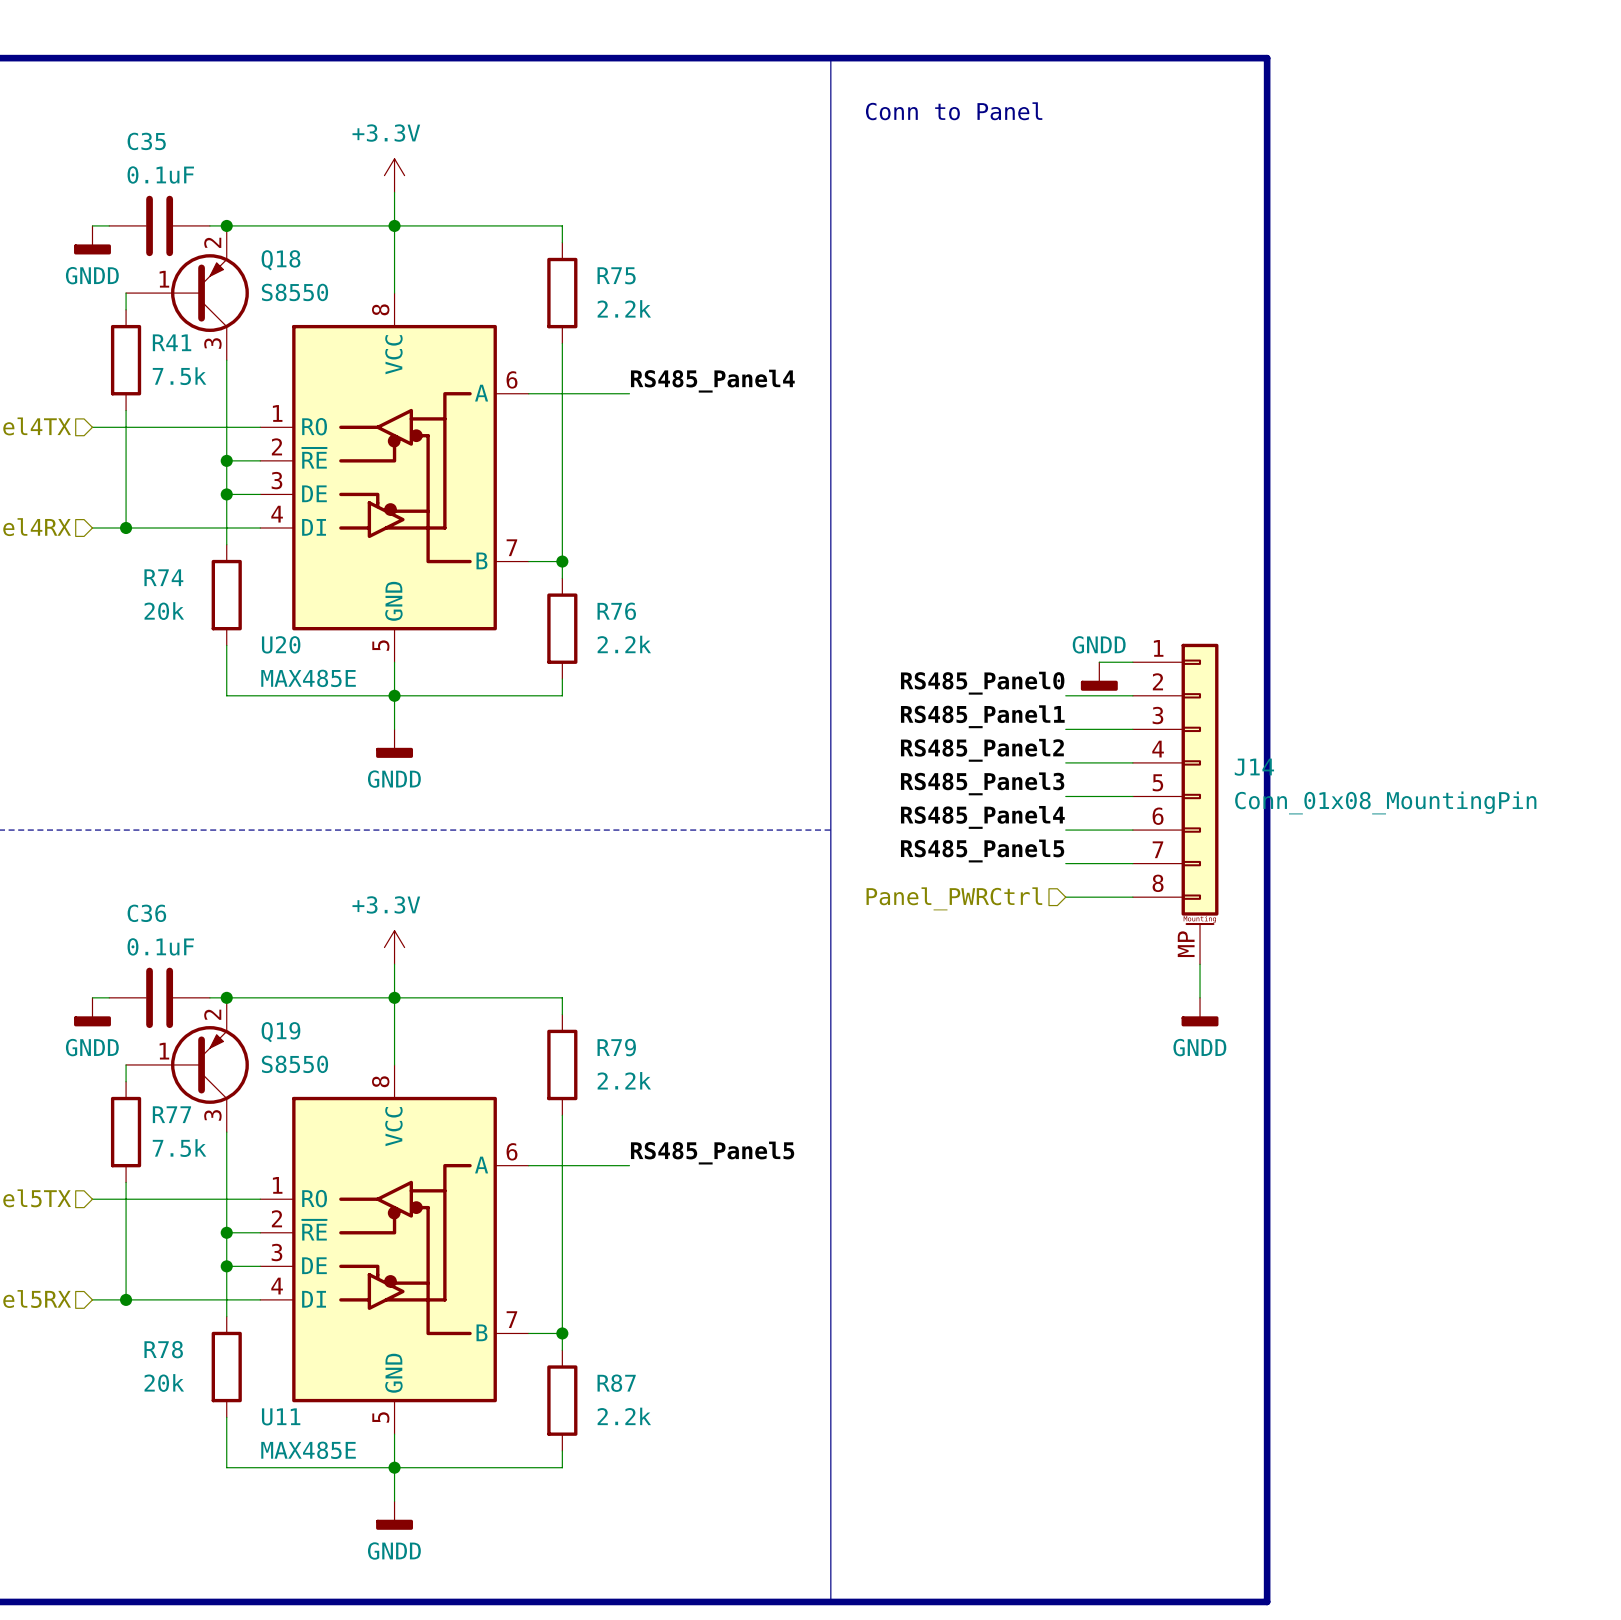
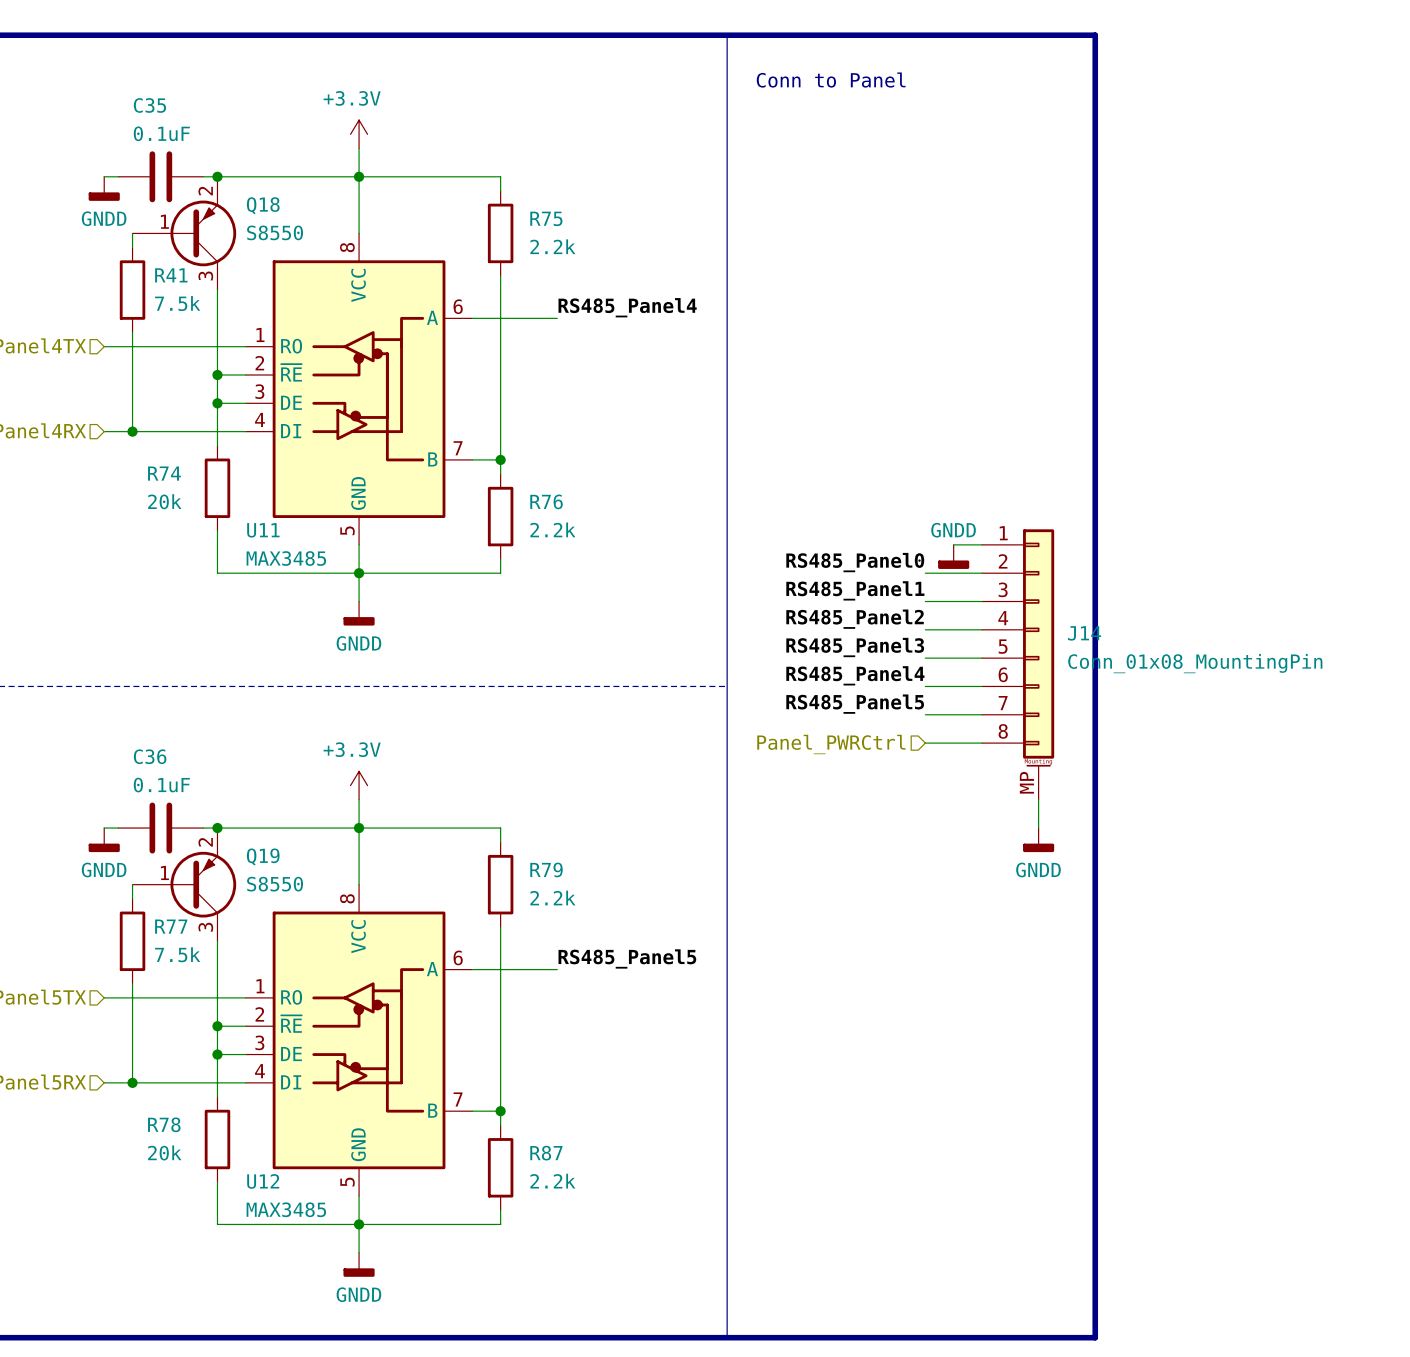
U20: MAX485E (394, 477) -> none
U11 symbol: [260, 1064, 529, 1435] -> [245, 233, 473, 545]
U12: none -> MAX3485 (359, 1040)
U11 value: MAX485E (308, 1450) -> MAX3485 (286, 558)

